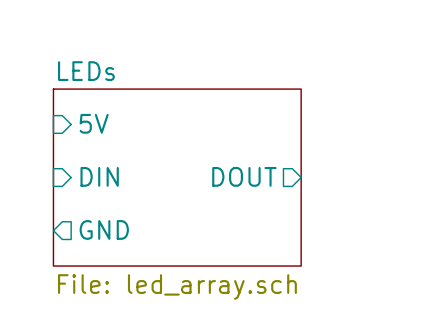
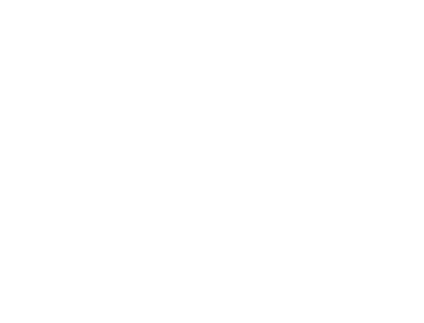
sheet pin: 5V (94, 123) -> none
sheet pin: DIN (99, 176) -> none
sheet pin: DOUT (244, 176) -> none
sheet LEDs: File: led_array.sch (177, 177) -> none
sheet pin: GND (104, 229) -> none

